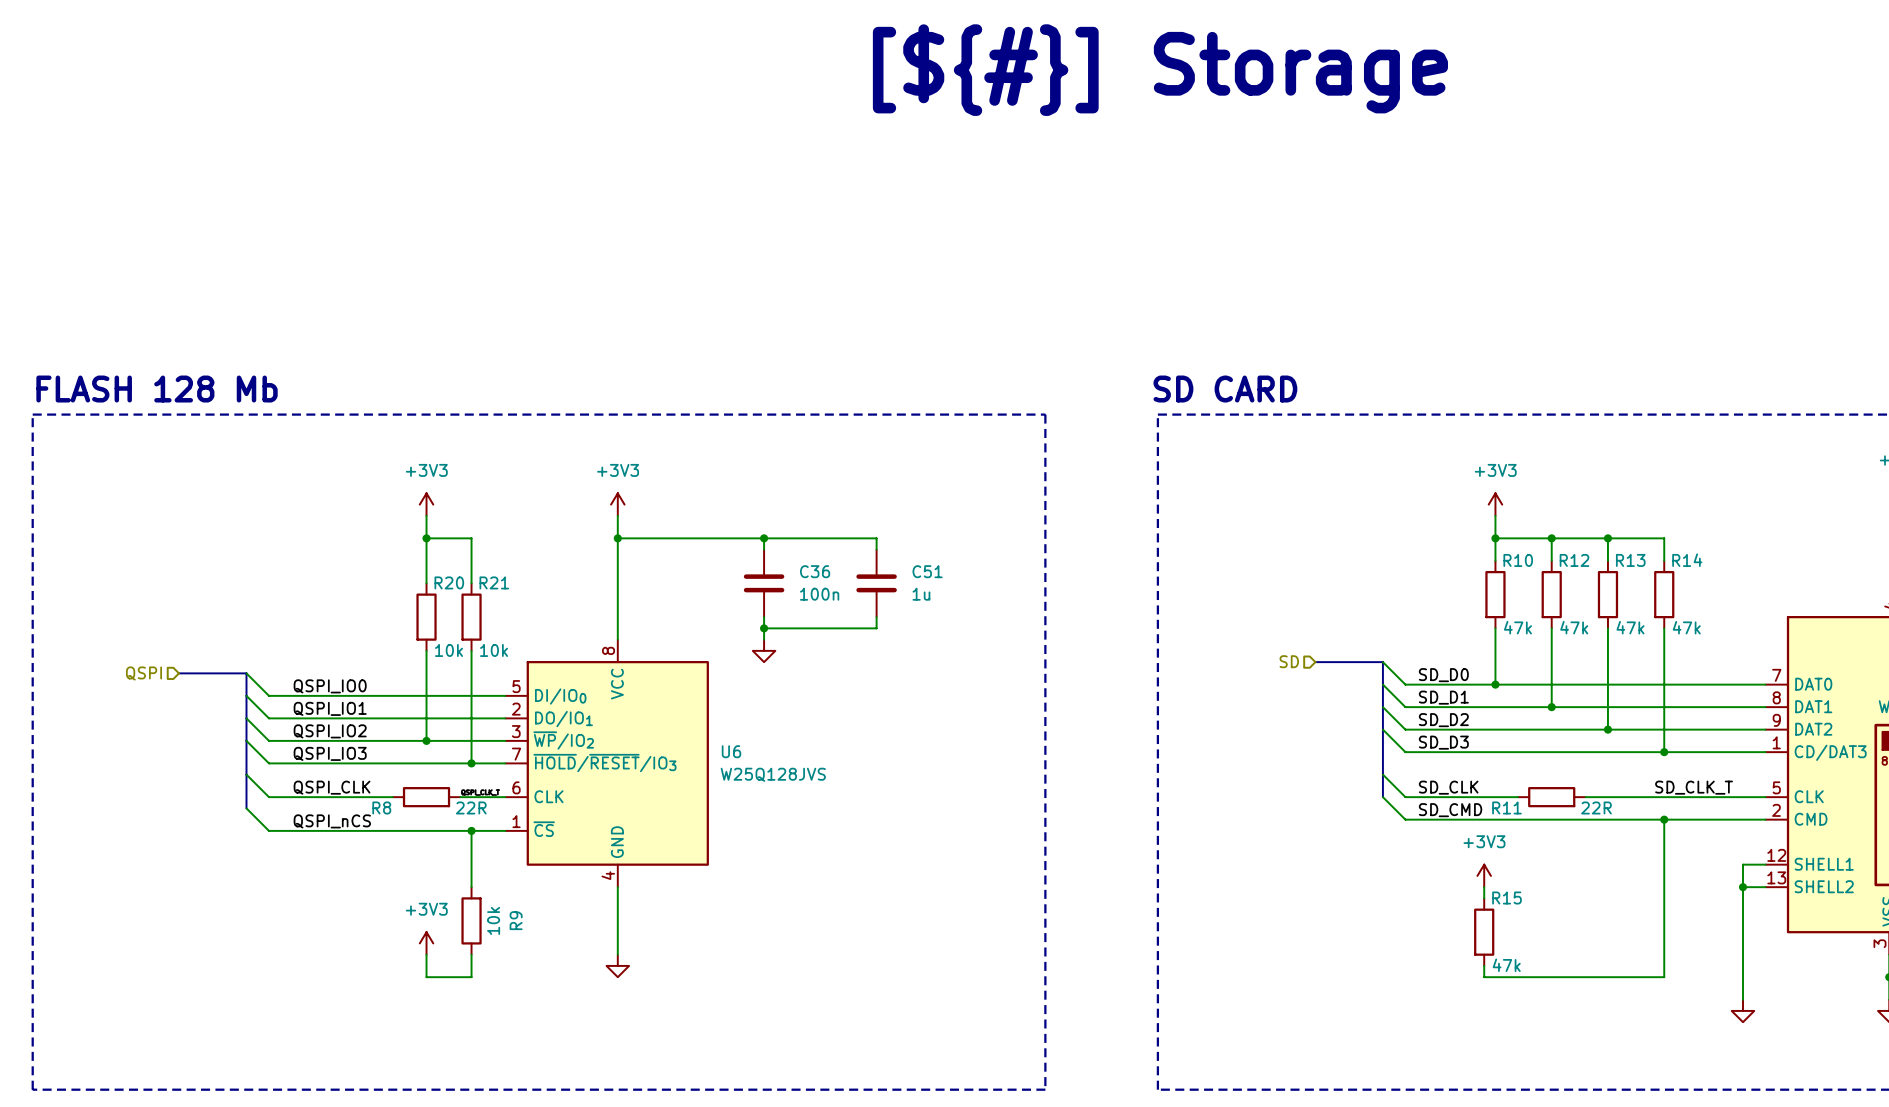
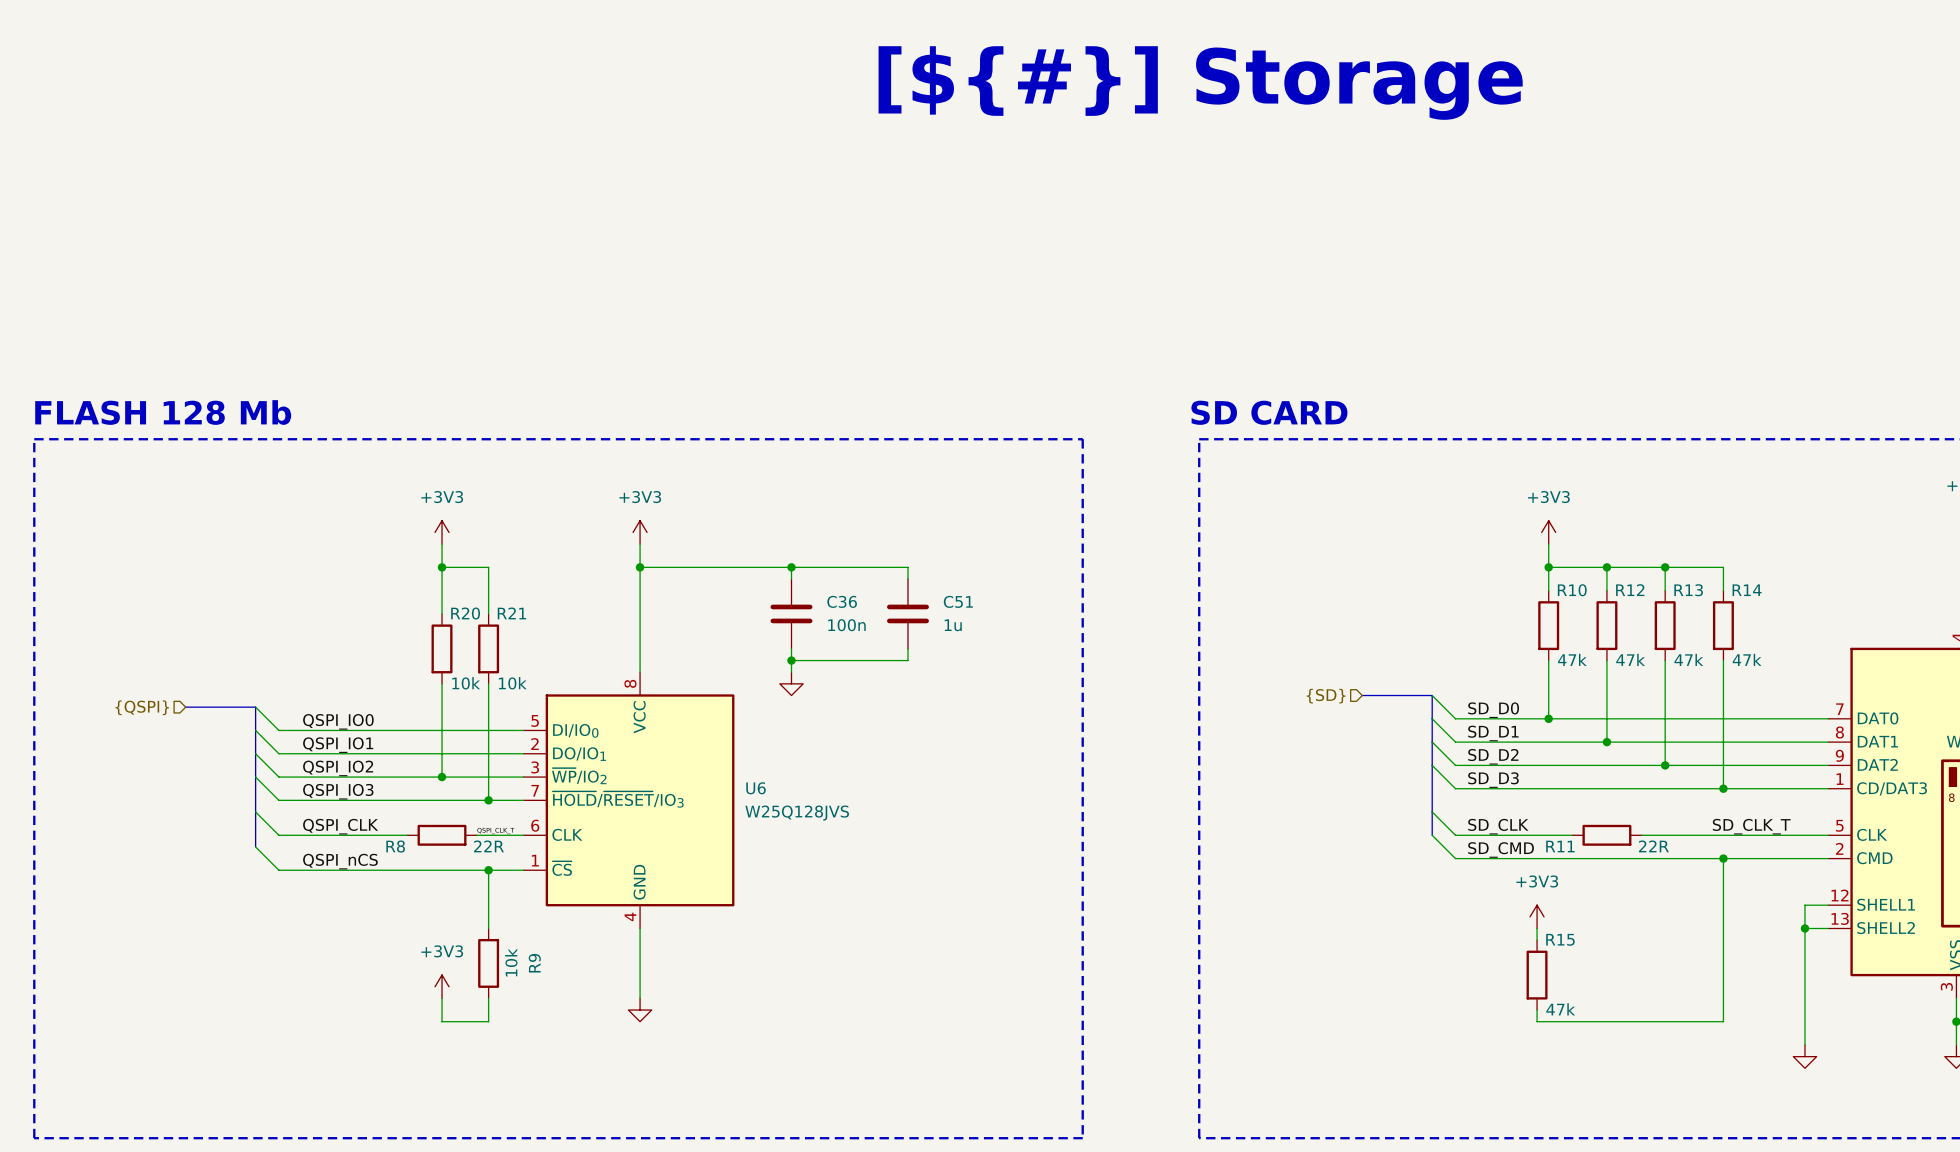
hierarchical label: SD (1289, 661) -> {SD} (1326, 696)
hierarchical label: QSPI (143, 673) -> {QSPI} (142, 707)

